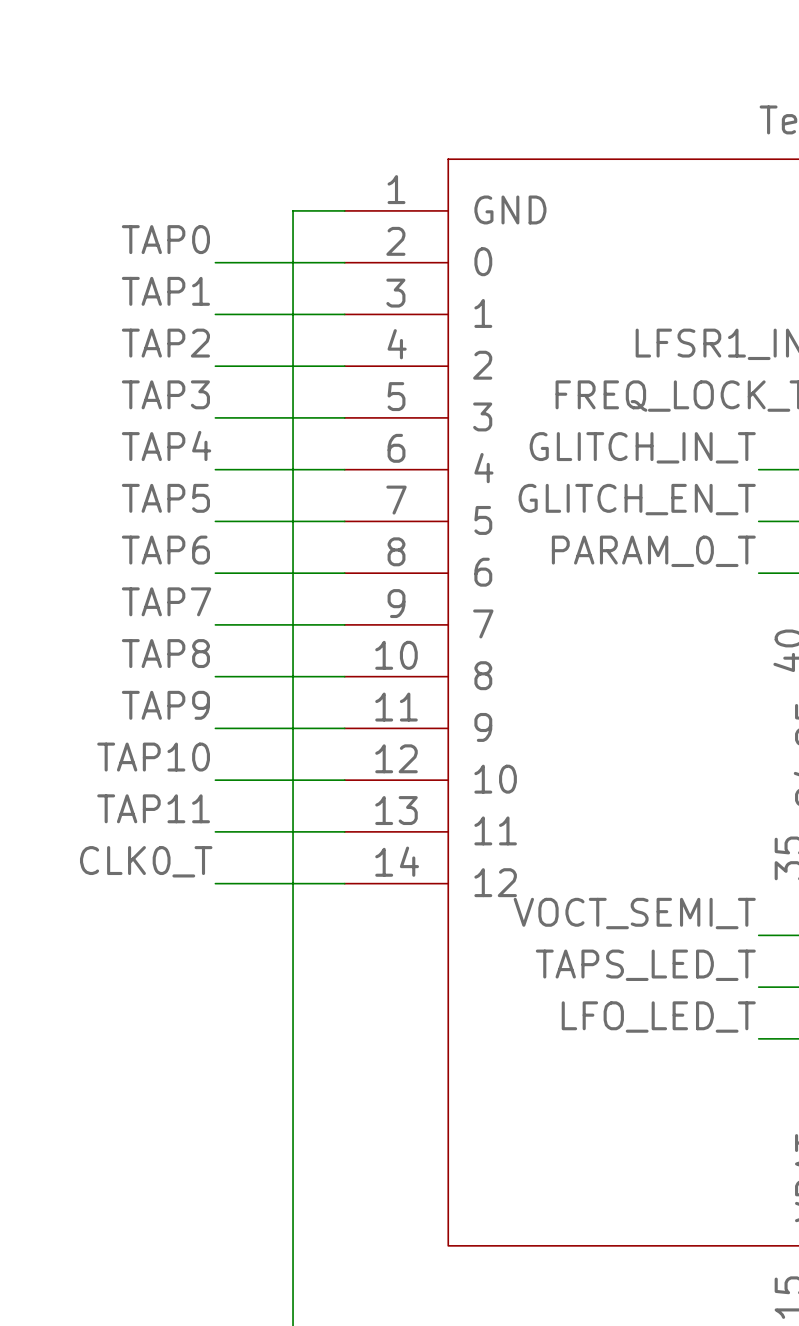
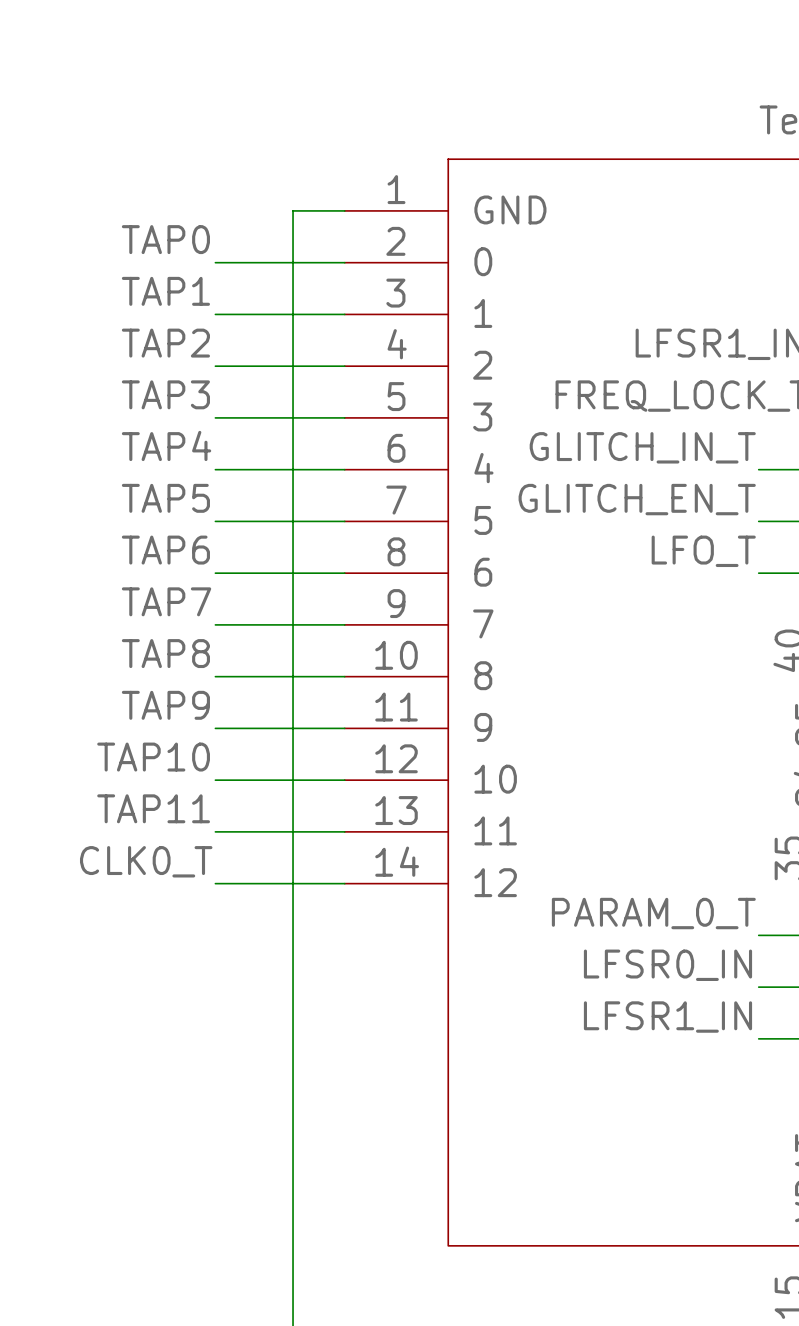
label: PARAM_0_T (653, 551) -> LFO_T (703, 551)
label: VOCT_SEMI_T (634, 913) -> PARAM_0_T (653, 913)
label: TAPS_LED_T (645, 965) -> LFSR0_IN (667, 965)
label: LFO_LED_T (658, 1017) -> LFSR1_IN (667, 1017)

